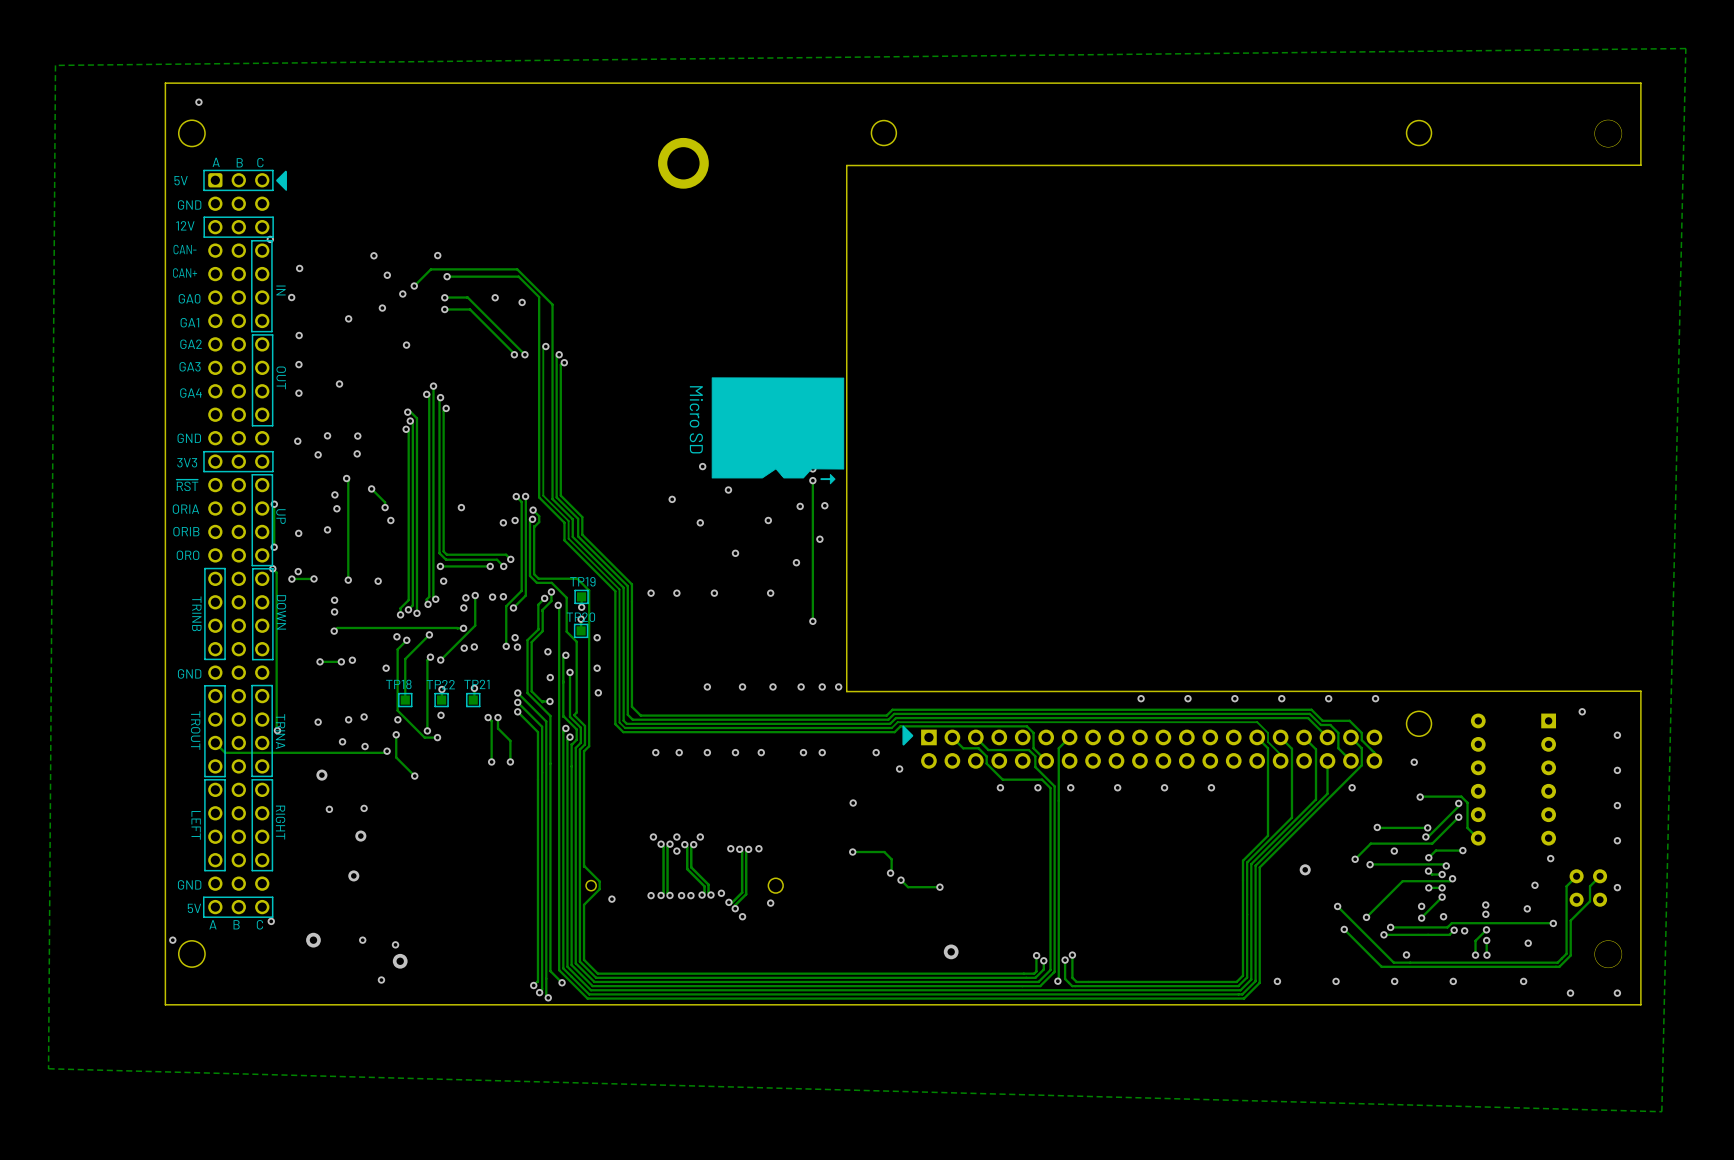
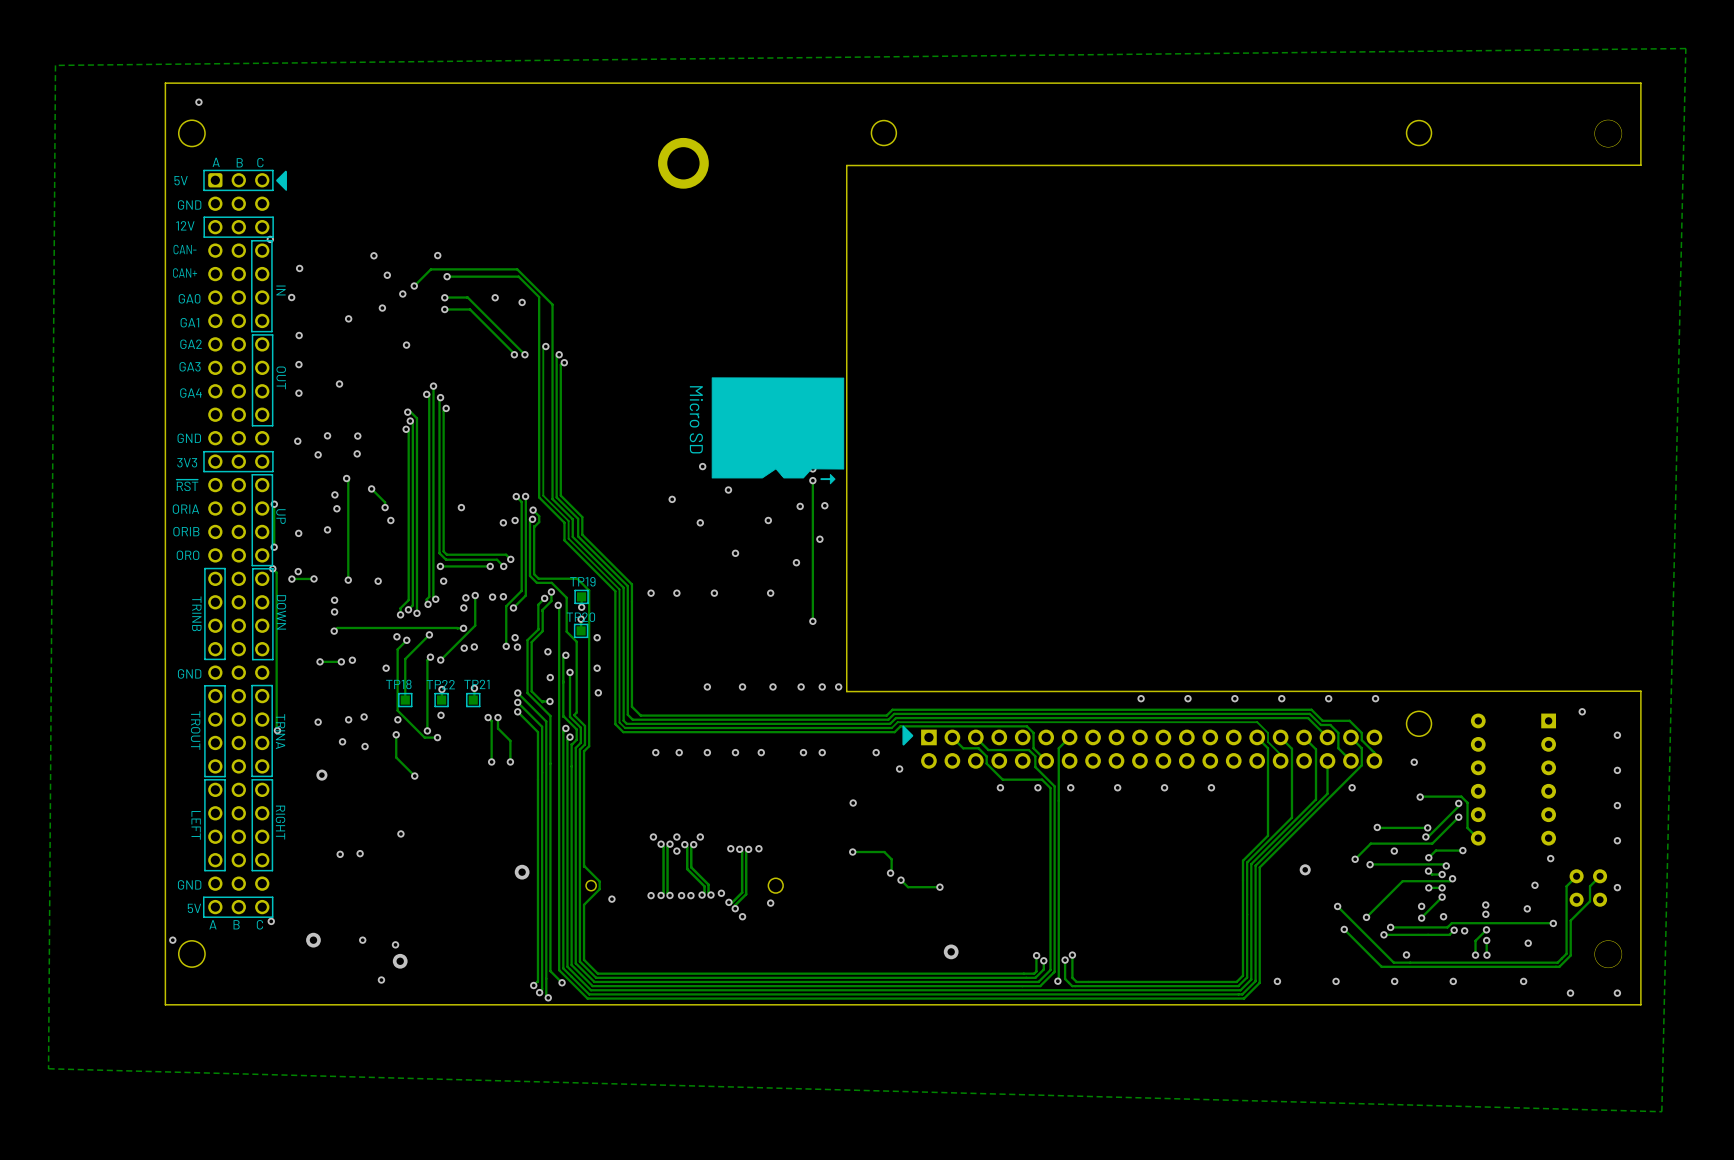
track: (215, 742) (225, 752) (385, 752) (387, 751) -> none
via: (387, 751) -> none
via: (364, 808) -> none
via: (329, 809) -> none
via: none -> (400, 833)
via: (360, 836) -> none
via: none -> (360, 853)
via: none -> (340, 854)
via: none -> (522, 872)
via: (353, 875) -> none

